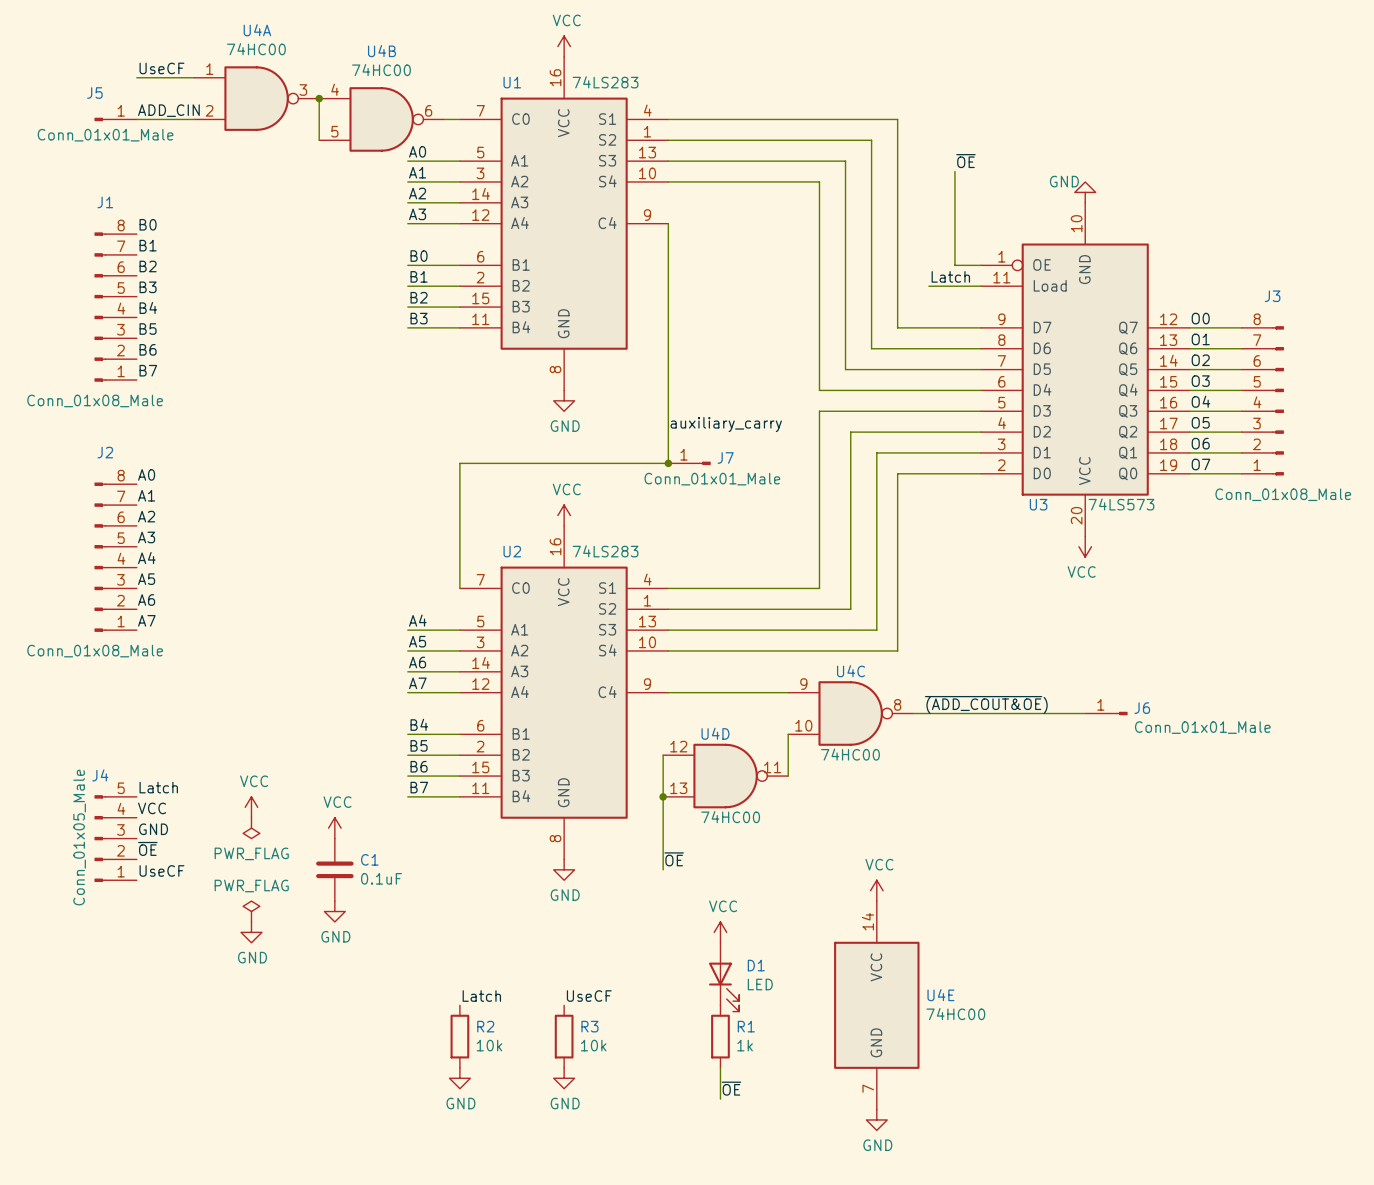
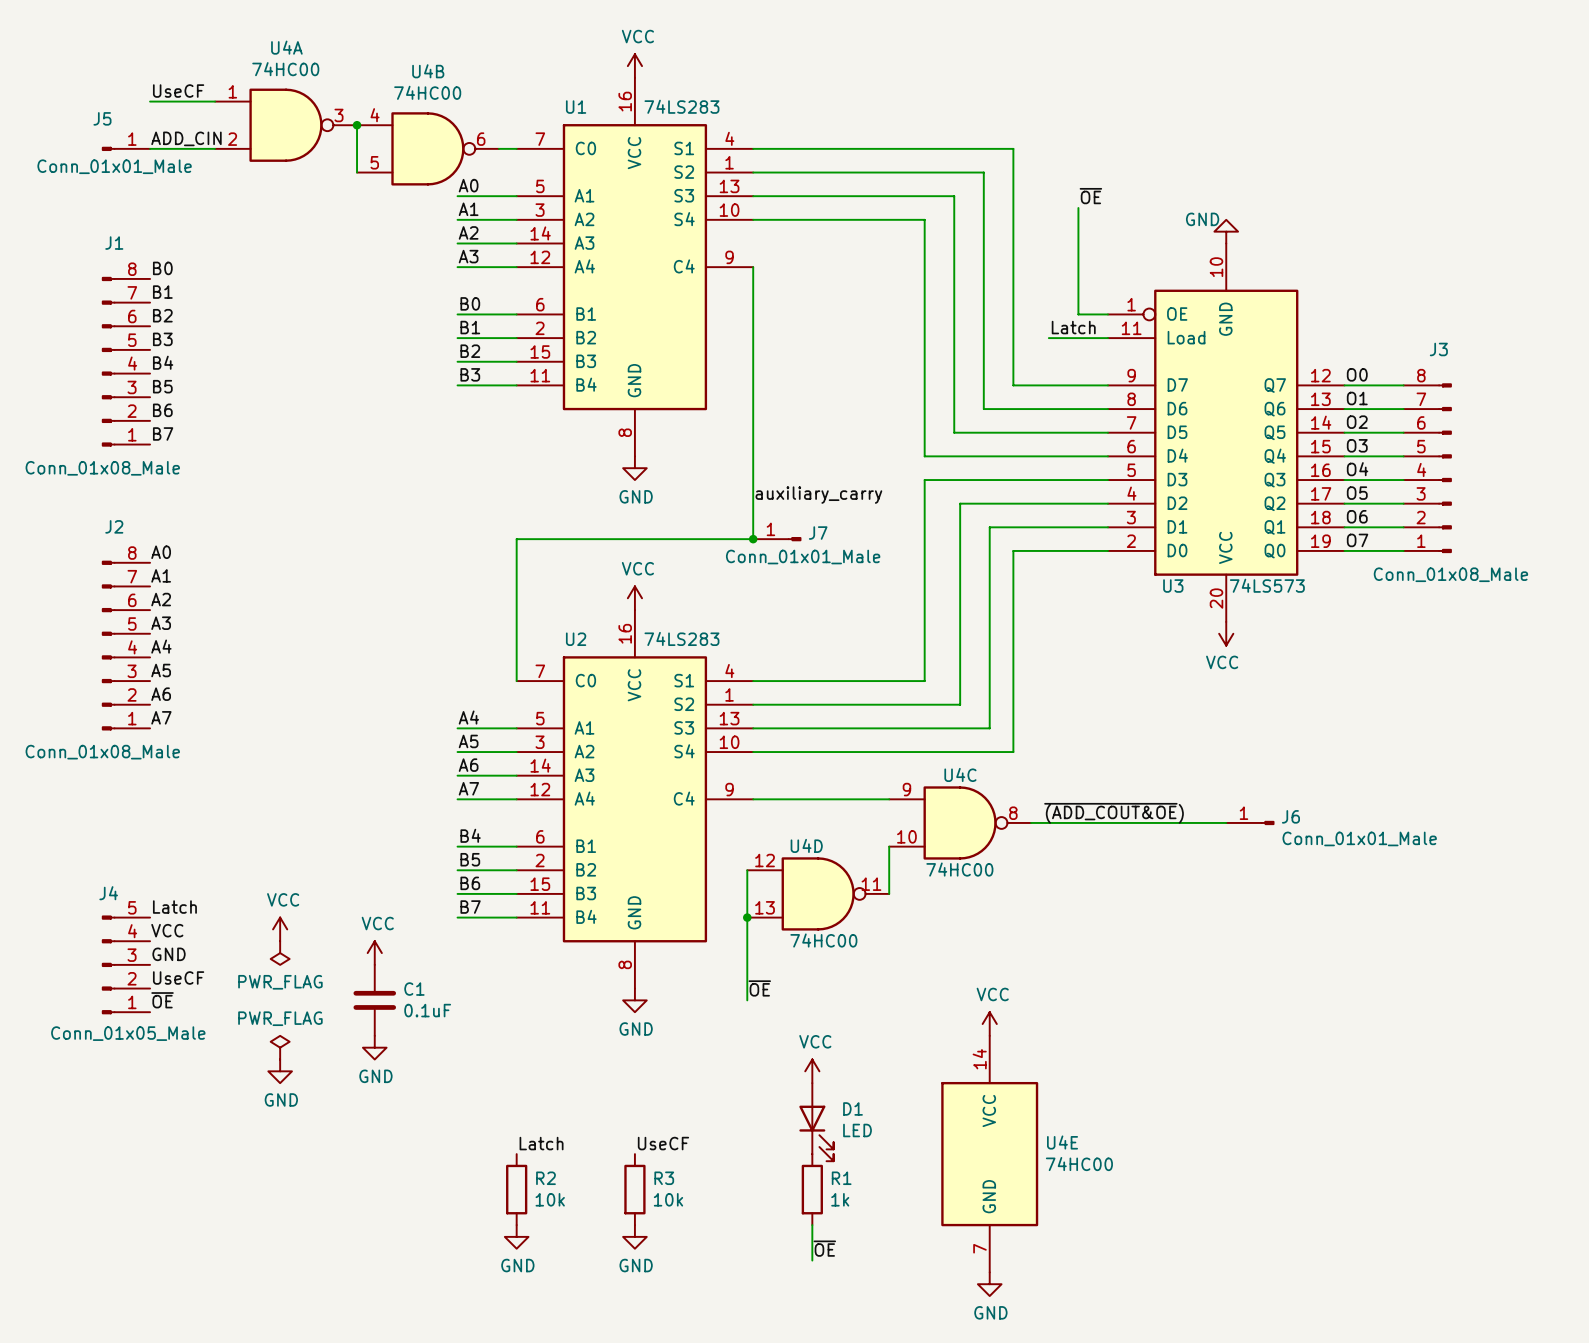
J4 value rotation: 0° (79, 837) -> 90° clockwise (128, 1033)
label: ~{OE} (147, 848) -> UseCF (178, 977)
label: UseCF (161, 870) -> ~{OE} (162, 1000)

